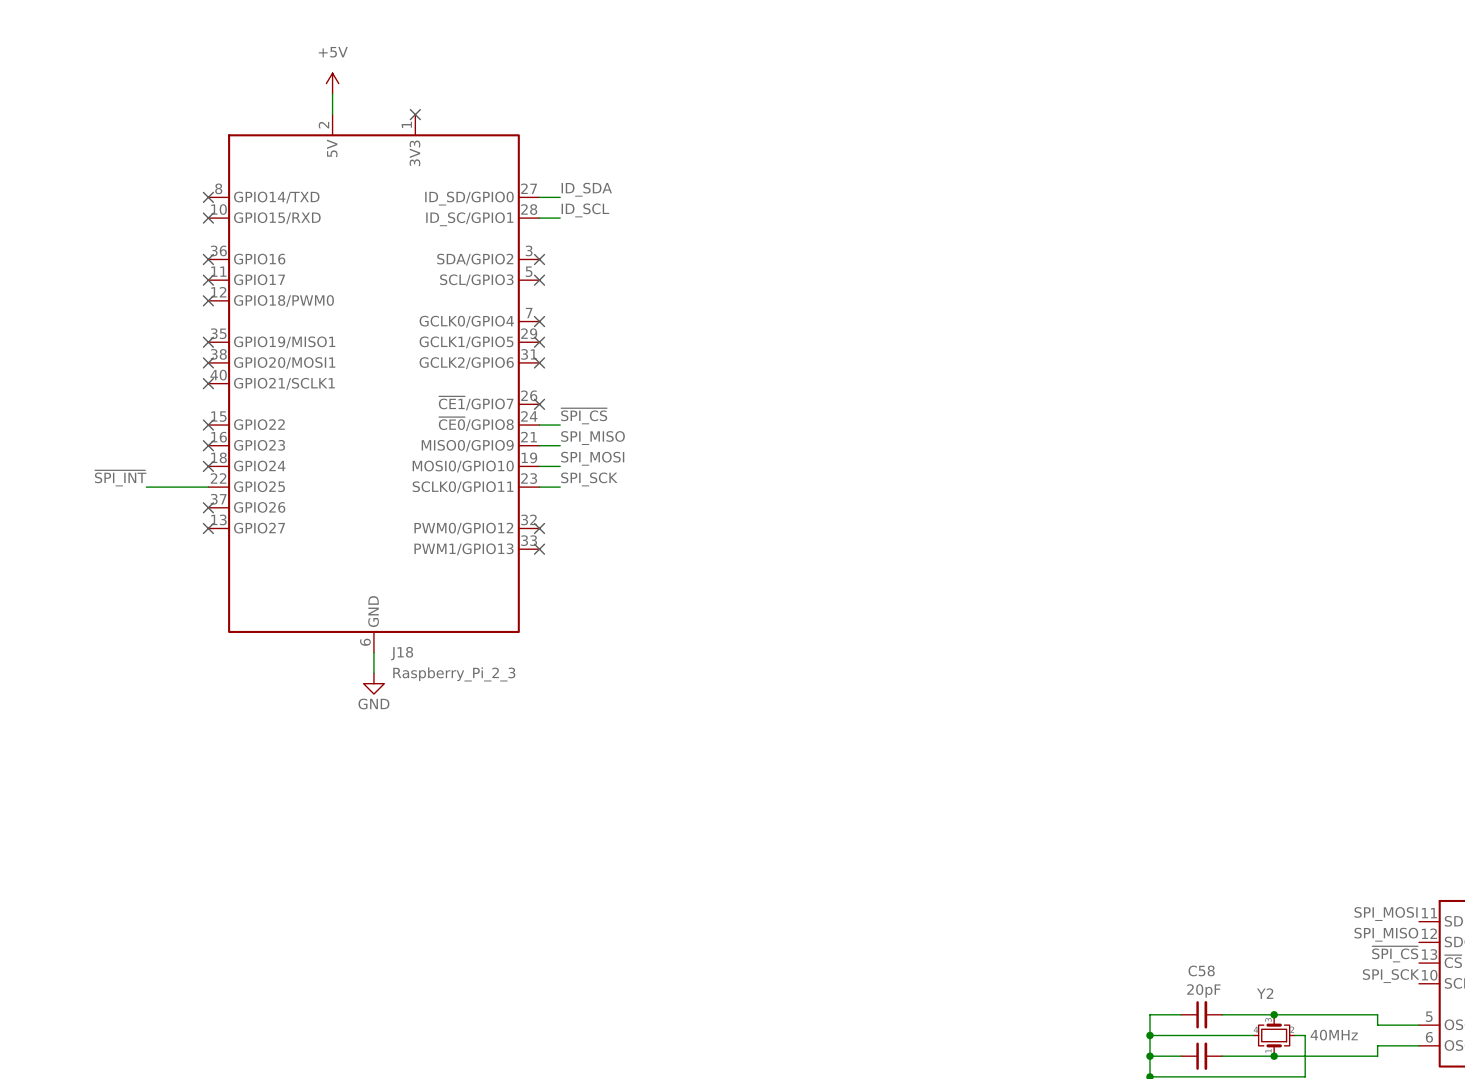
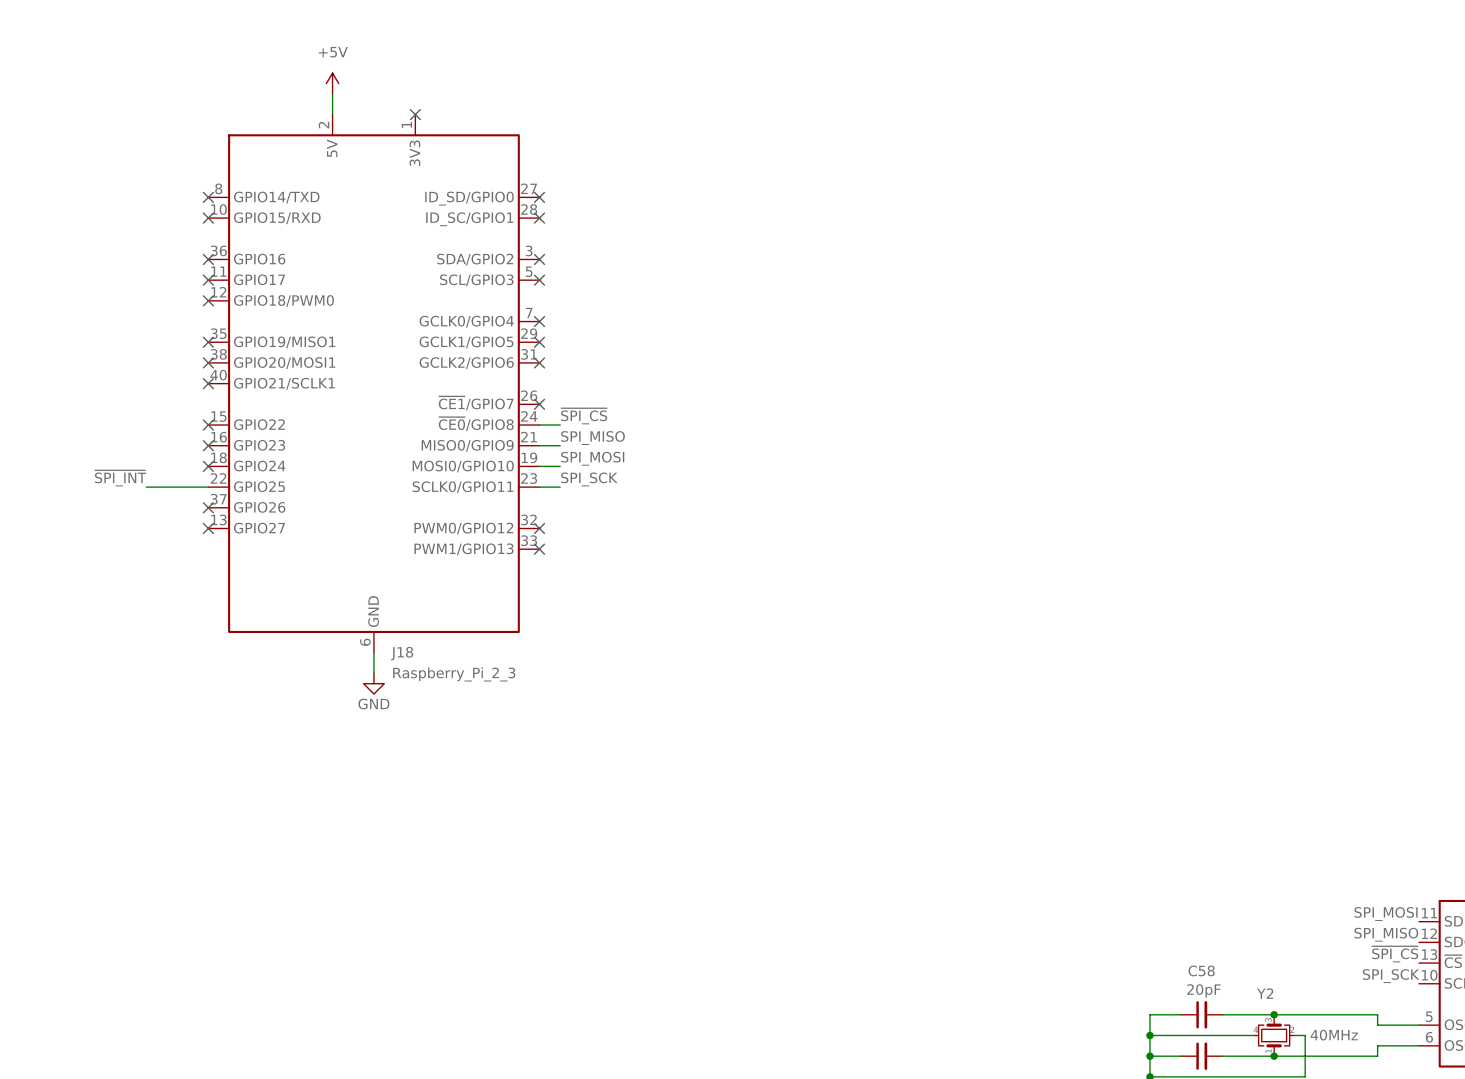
label: ID_SDA (586, 189) -> none
wire: (539, 197) (560, 197) -> none
no-connect mark: none -> (539, 197)
label: ID_SCL (585, 210) -> none
wire: (539, 218) (560, 218) -> none
no-connect mark: none -> (539, 218)

